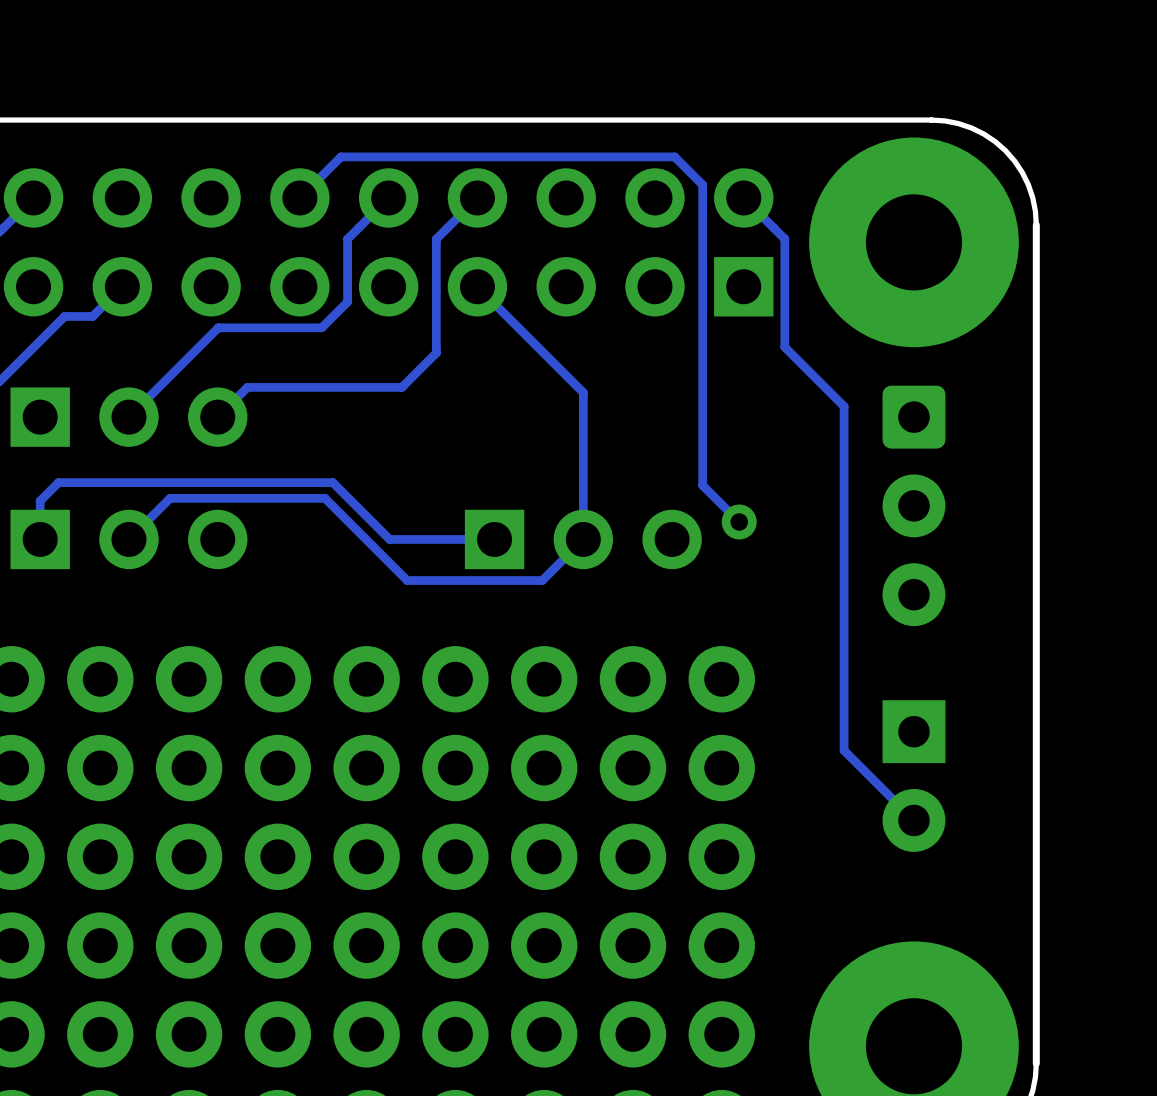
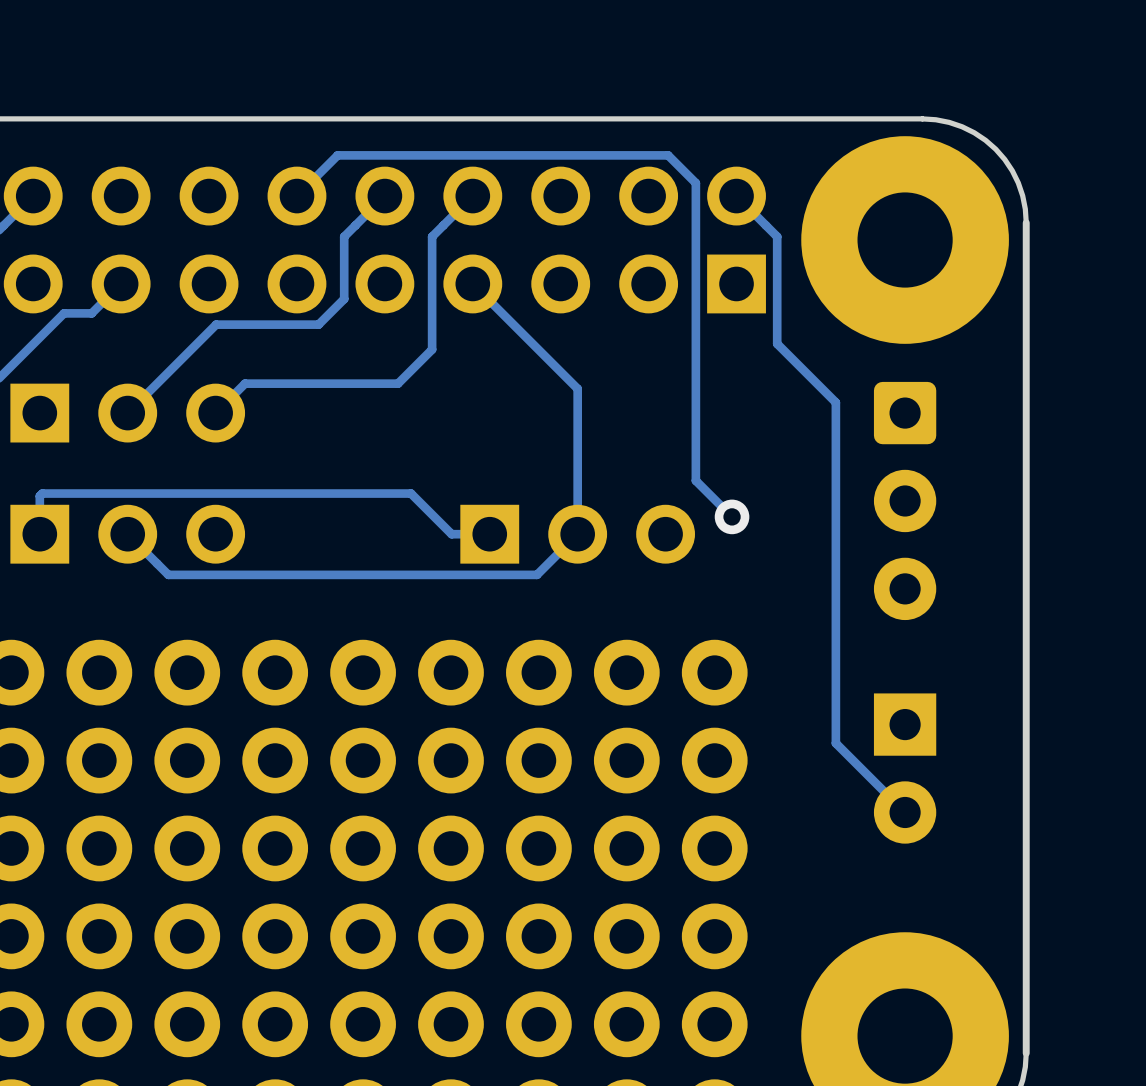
track: (42, 498) (58, 482) (332, 482) (389, 539) (456, 539) -> none
track: (170, 498) (128, 539) -> (168, 493) (42, 493)
track: (325, 498) (407, 580) -> (321, 493) (411, 493) (451, 534)
track: none -> (127, 534) (168, 574) (403, 574)

